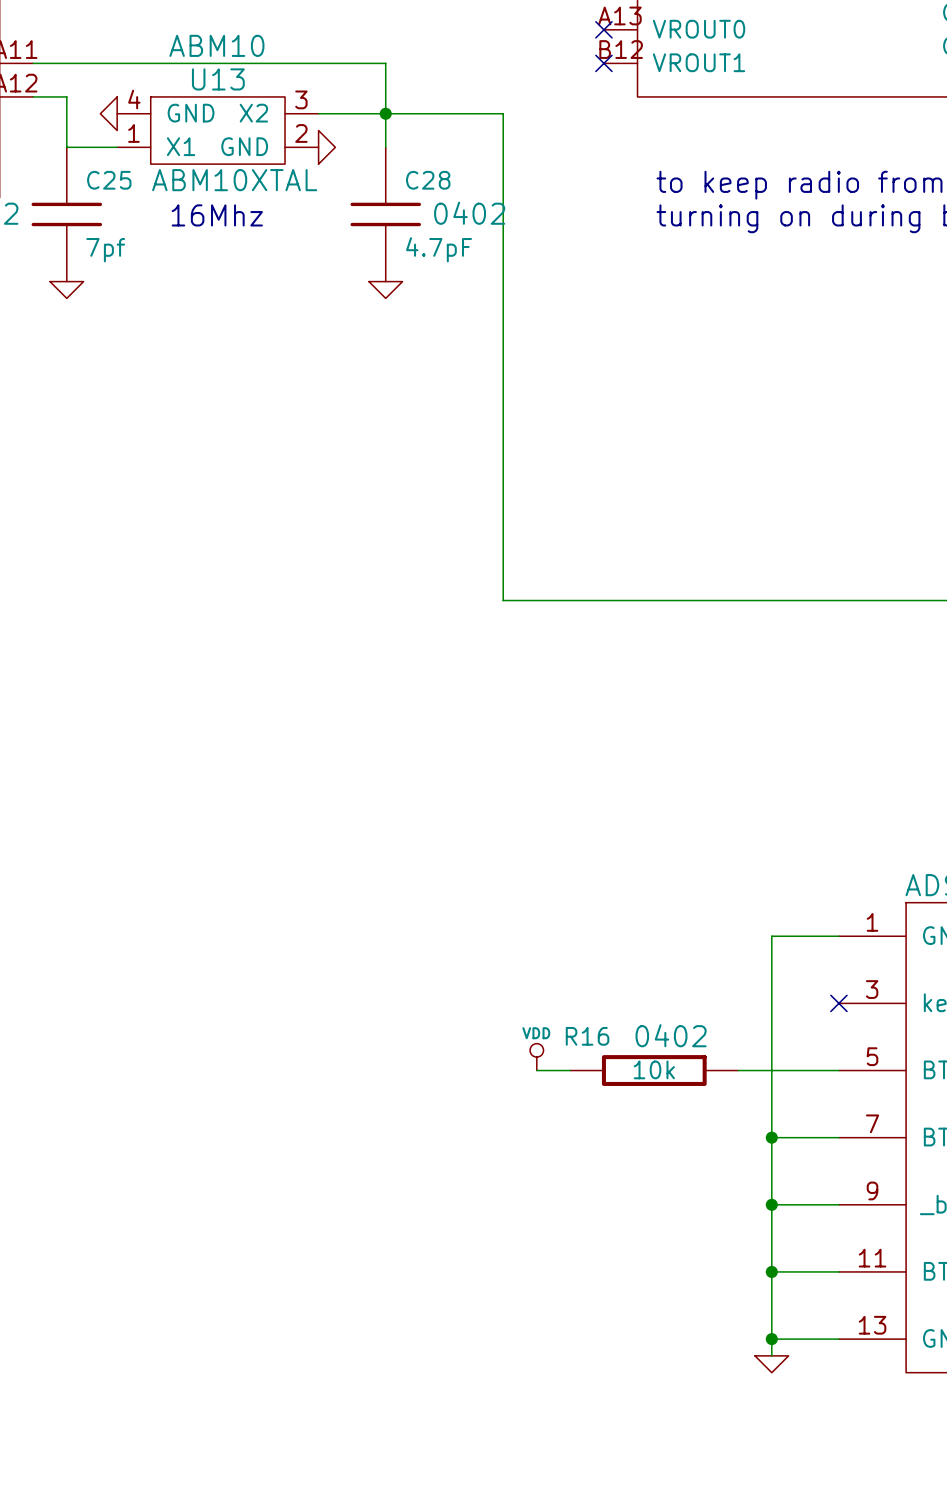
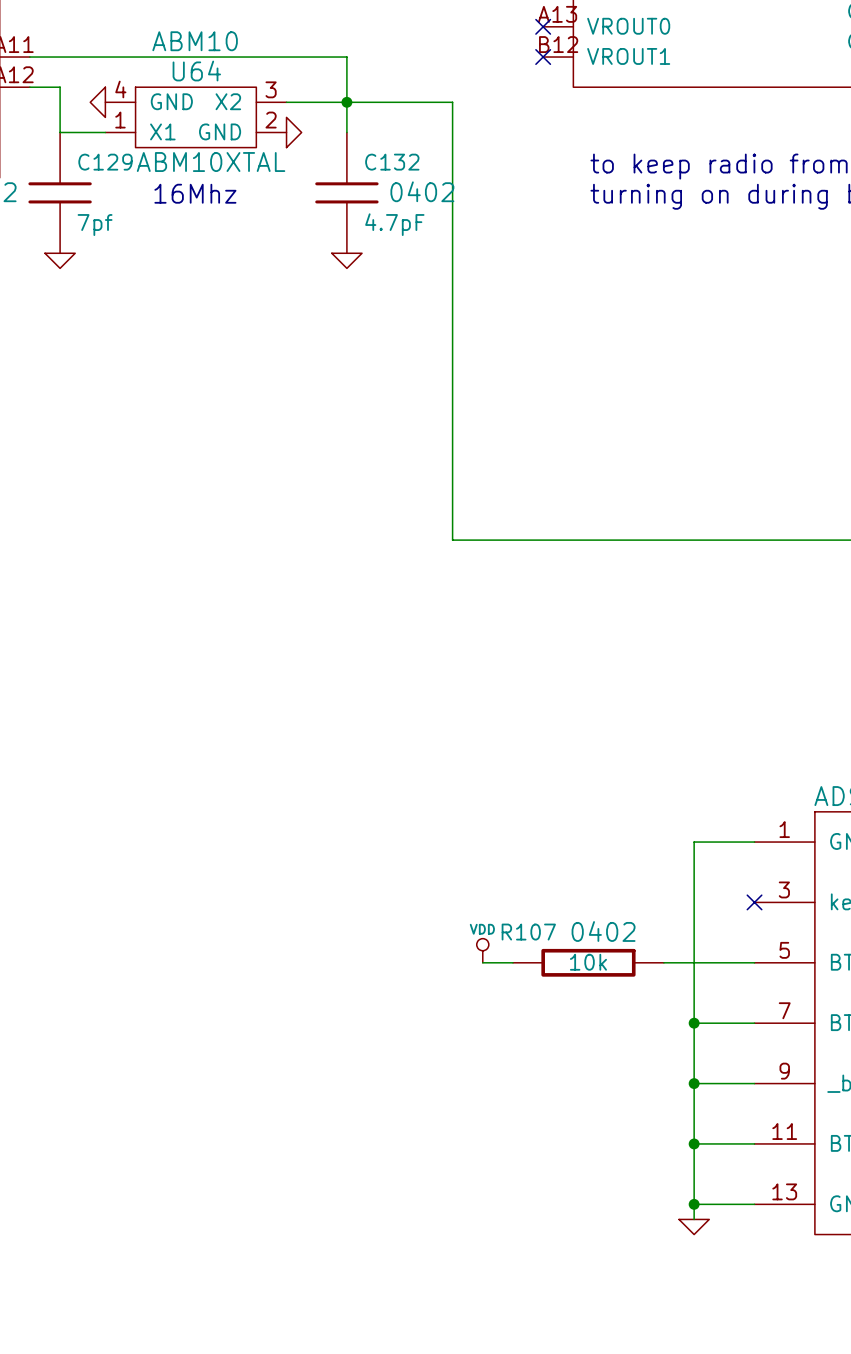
U13 name: U13 (218, 79) -> U64 (196, 71)
C25 name: C25 (109, 180) -> C129 (105, 162)
C28 name: C28 (428, 180) -> C132 (392, 162)
R16 name: R16 (587, 1036) -> R107 (528, 932)

